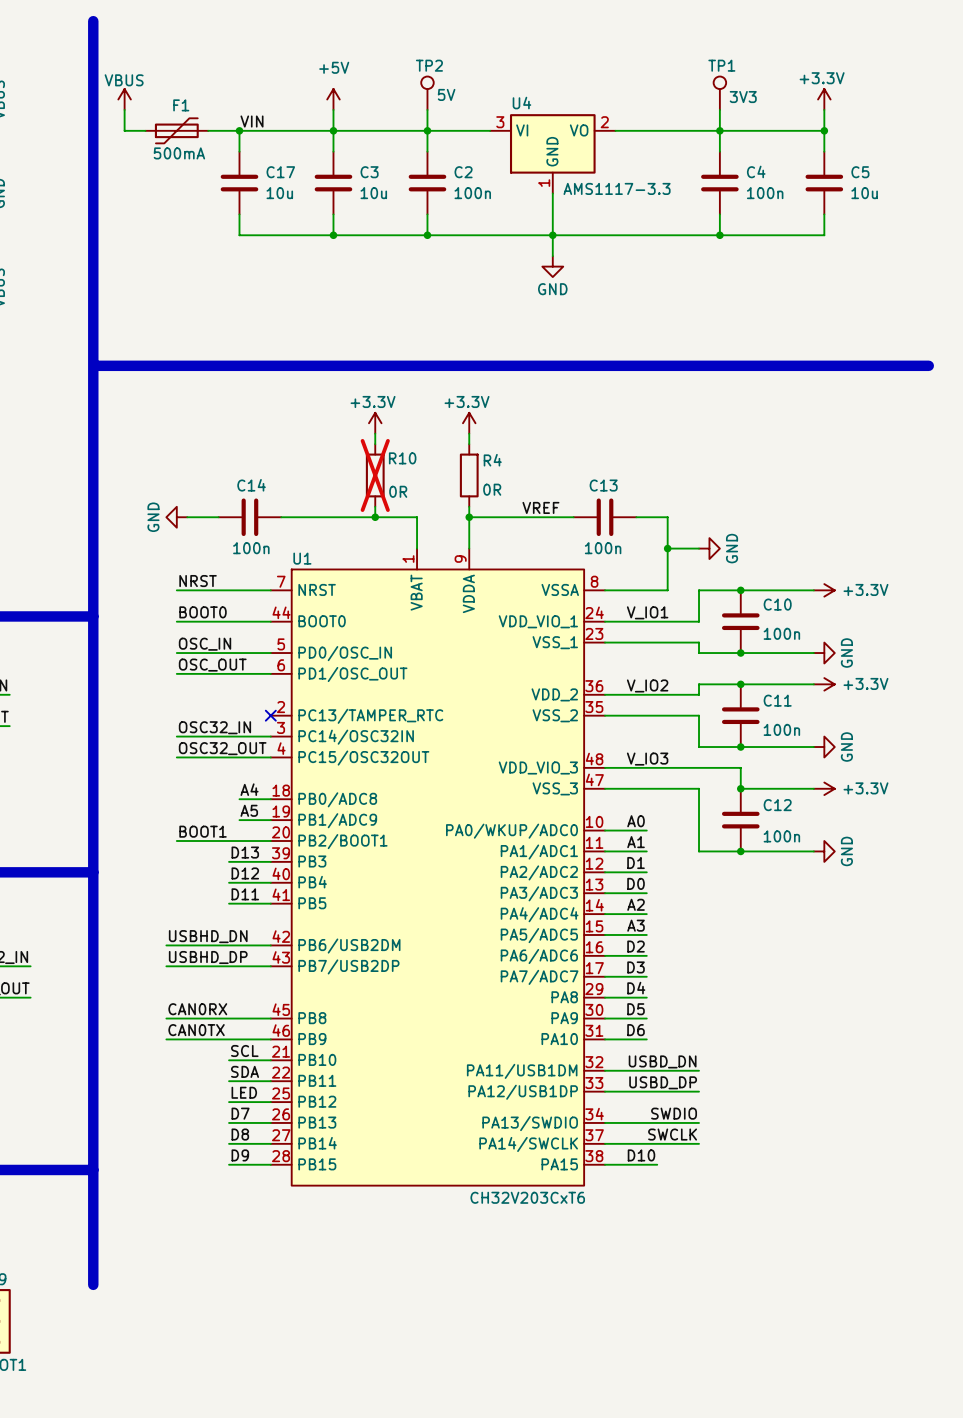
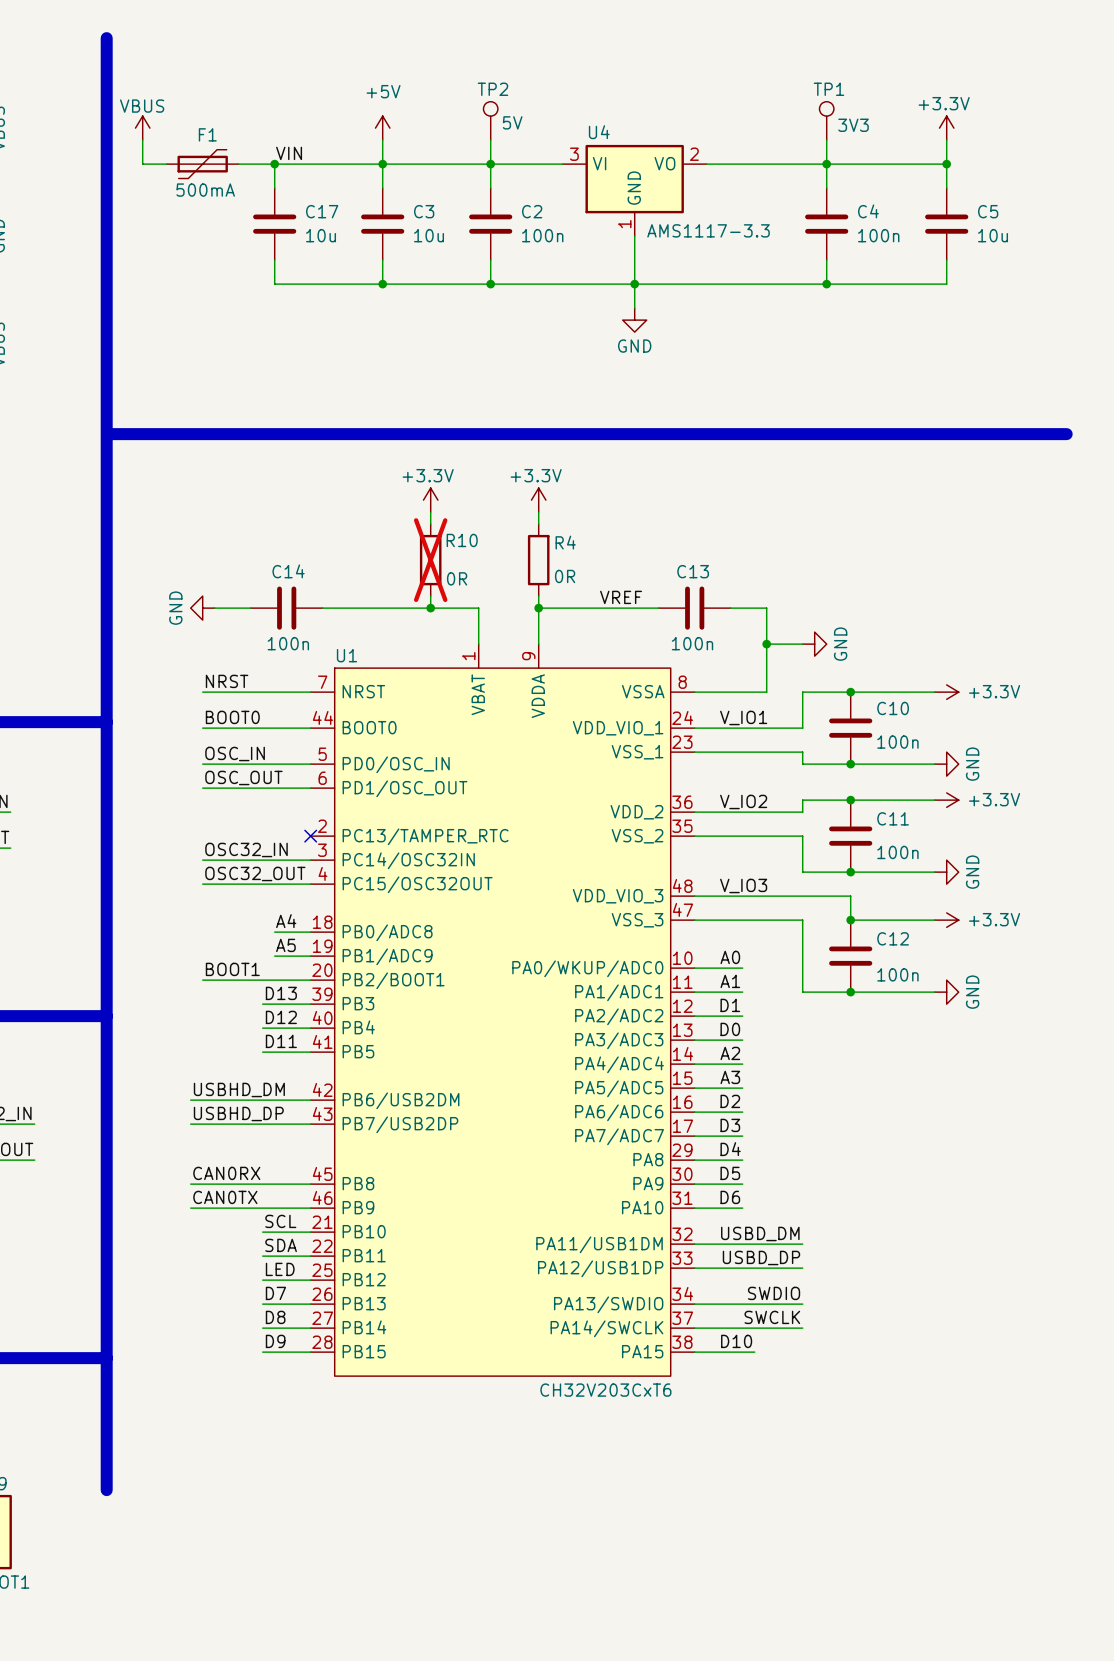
label: USBHD_DN (208, 936) -> USBHD_DM (239, 1089)
label: USBD_DN (662, 1061) -> USBD_DM (760, 1233)

